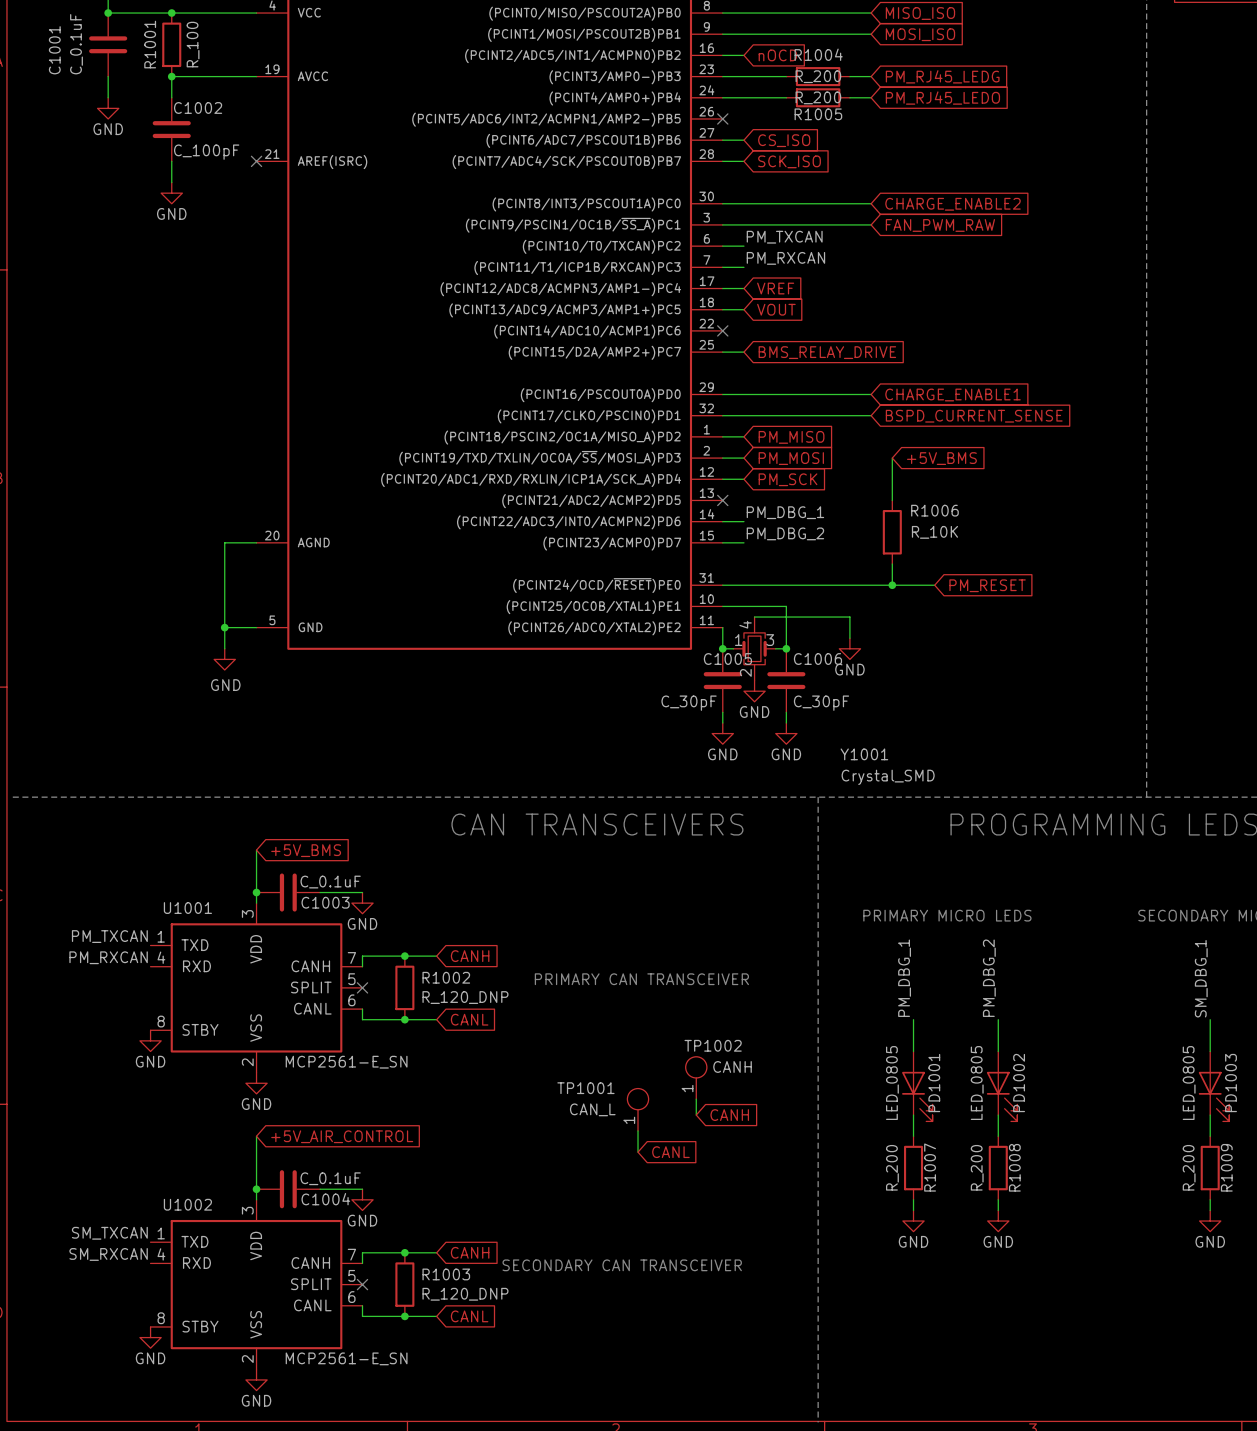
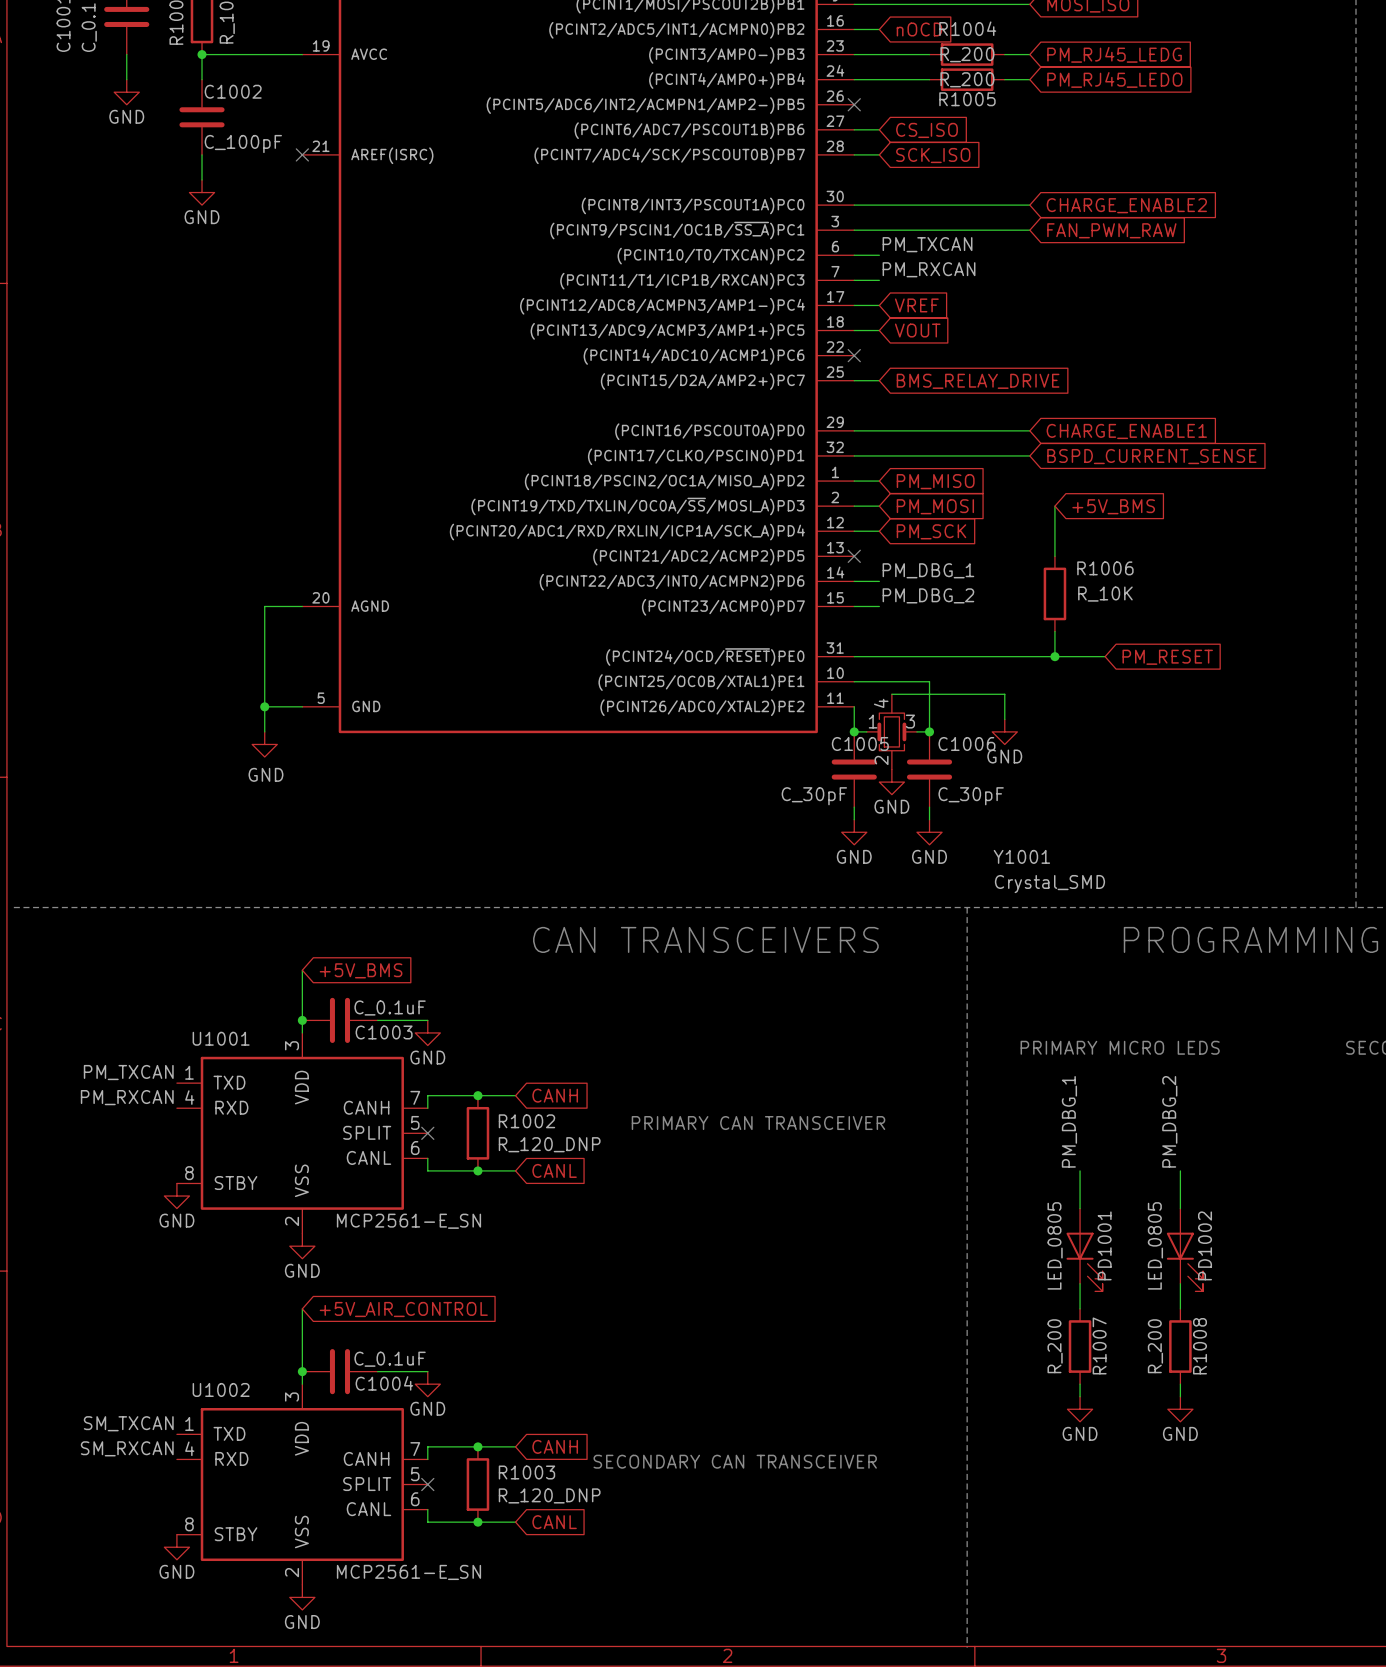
TP1002: CANH (696, 1077) -> none
wire: (696, 1099) (696, 1115) -> none
TP1001: CAN_L (638, 1109) -> none
global label: CANH (729, 1115) -> none
wire: (638, 1130) (638, 1152) -> none
global label: CANL (670, 1152) -> none

